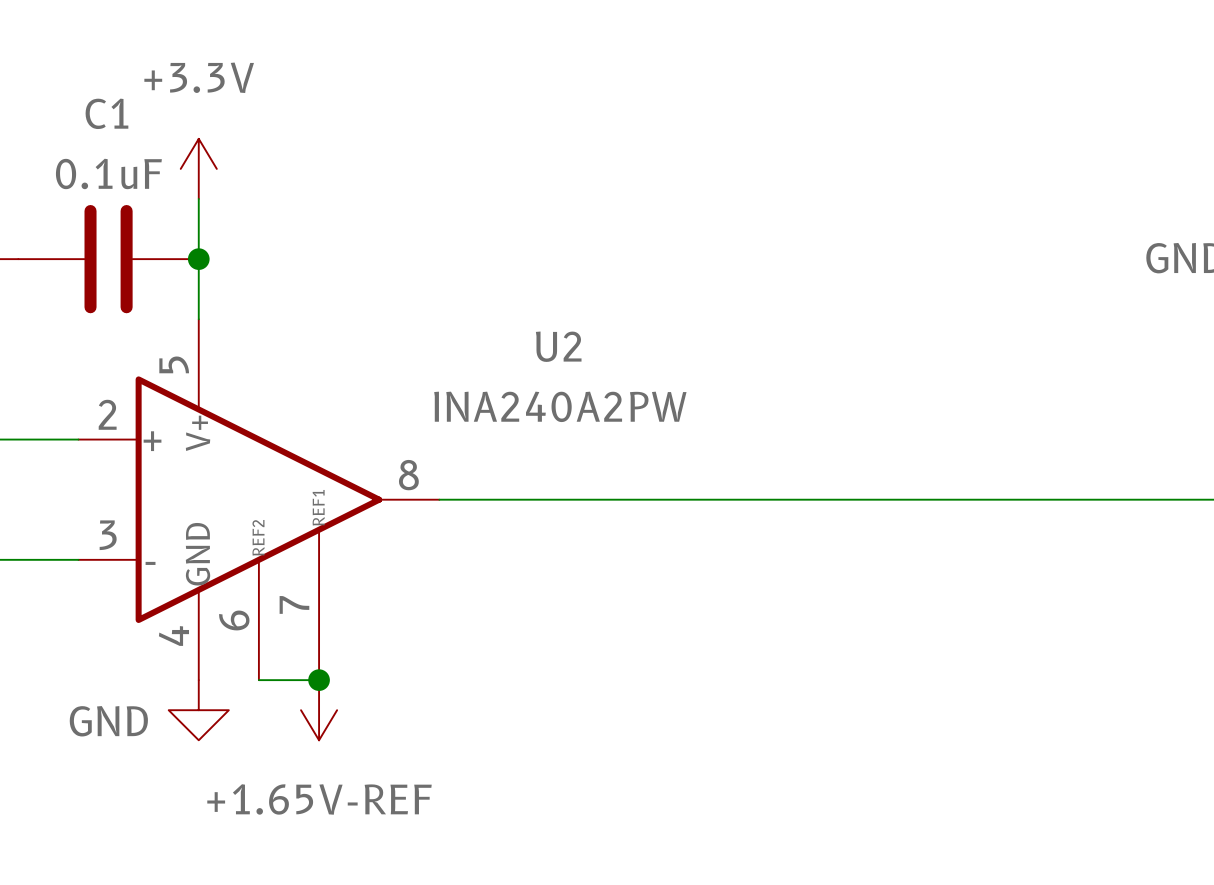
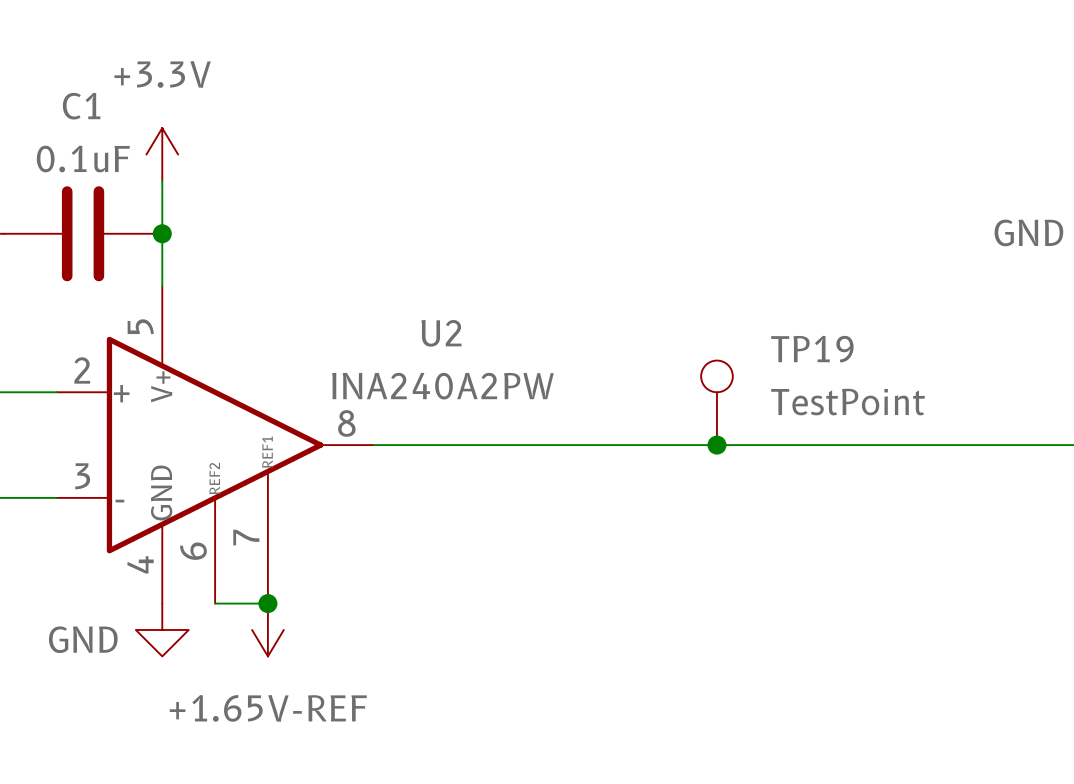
U2 name position: U2 (558, 346) -> U2 (441, 333)
U2 value position: INA240A2PW (560, 406) -> INA240A2PW (442, 386)
TP19: none -> TestPoint (716, 402)
junction: none -> (716, 445)

